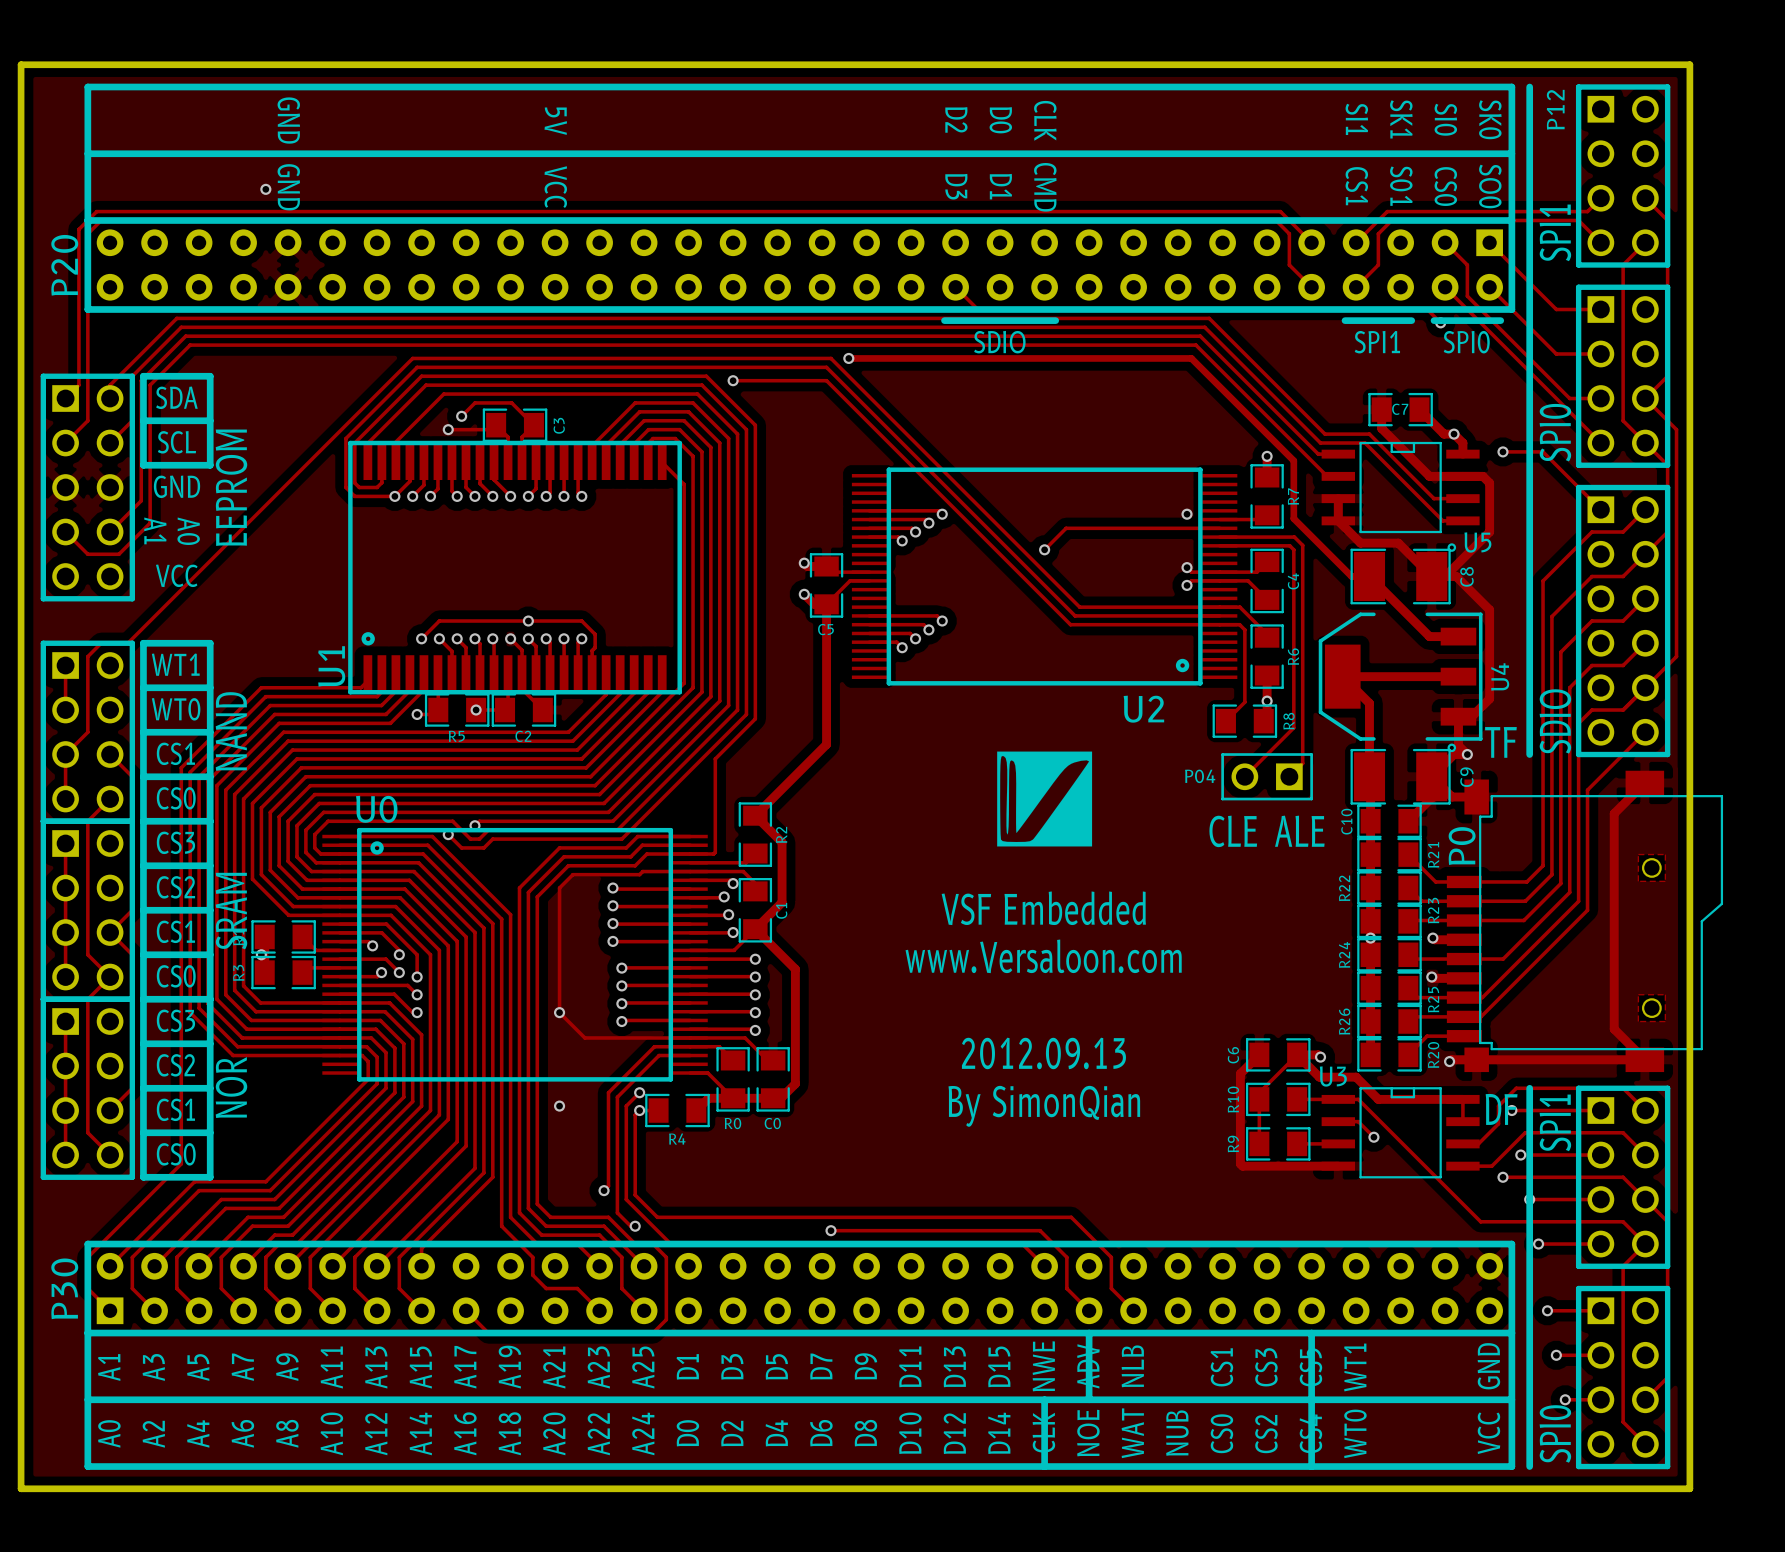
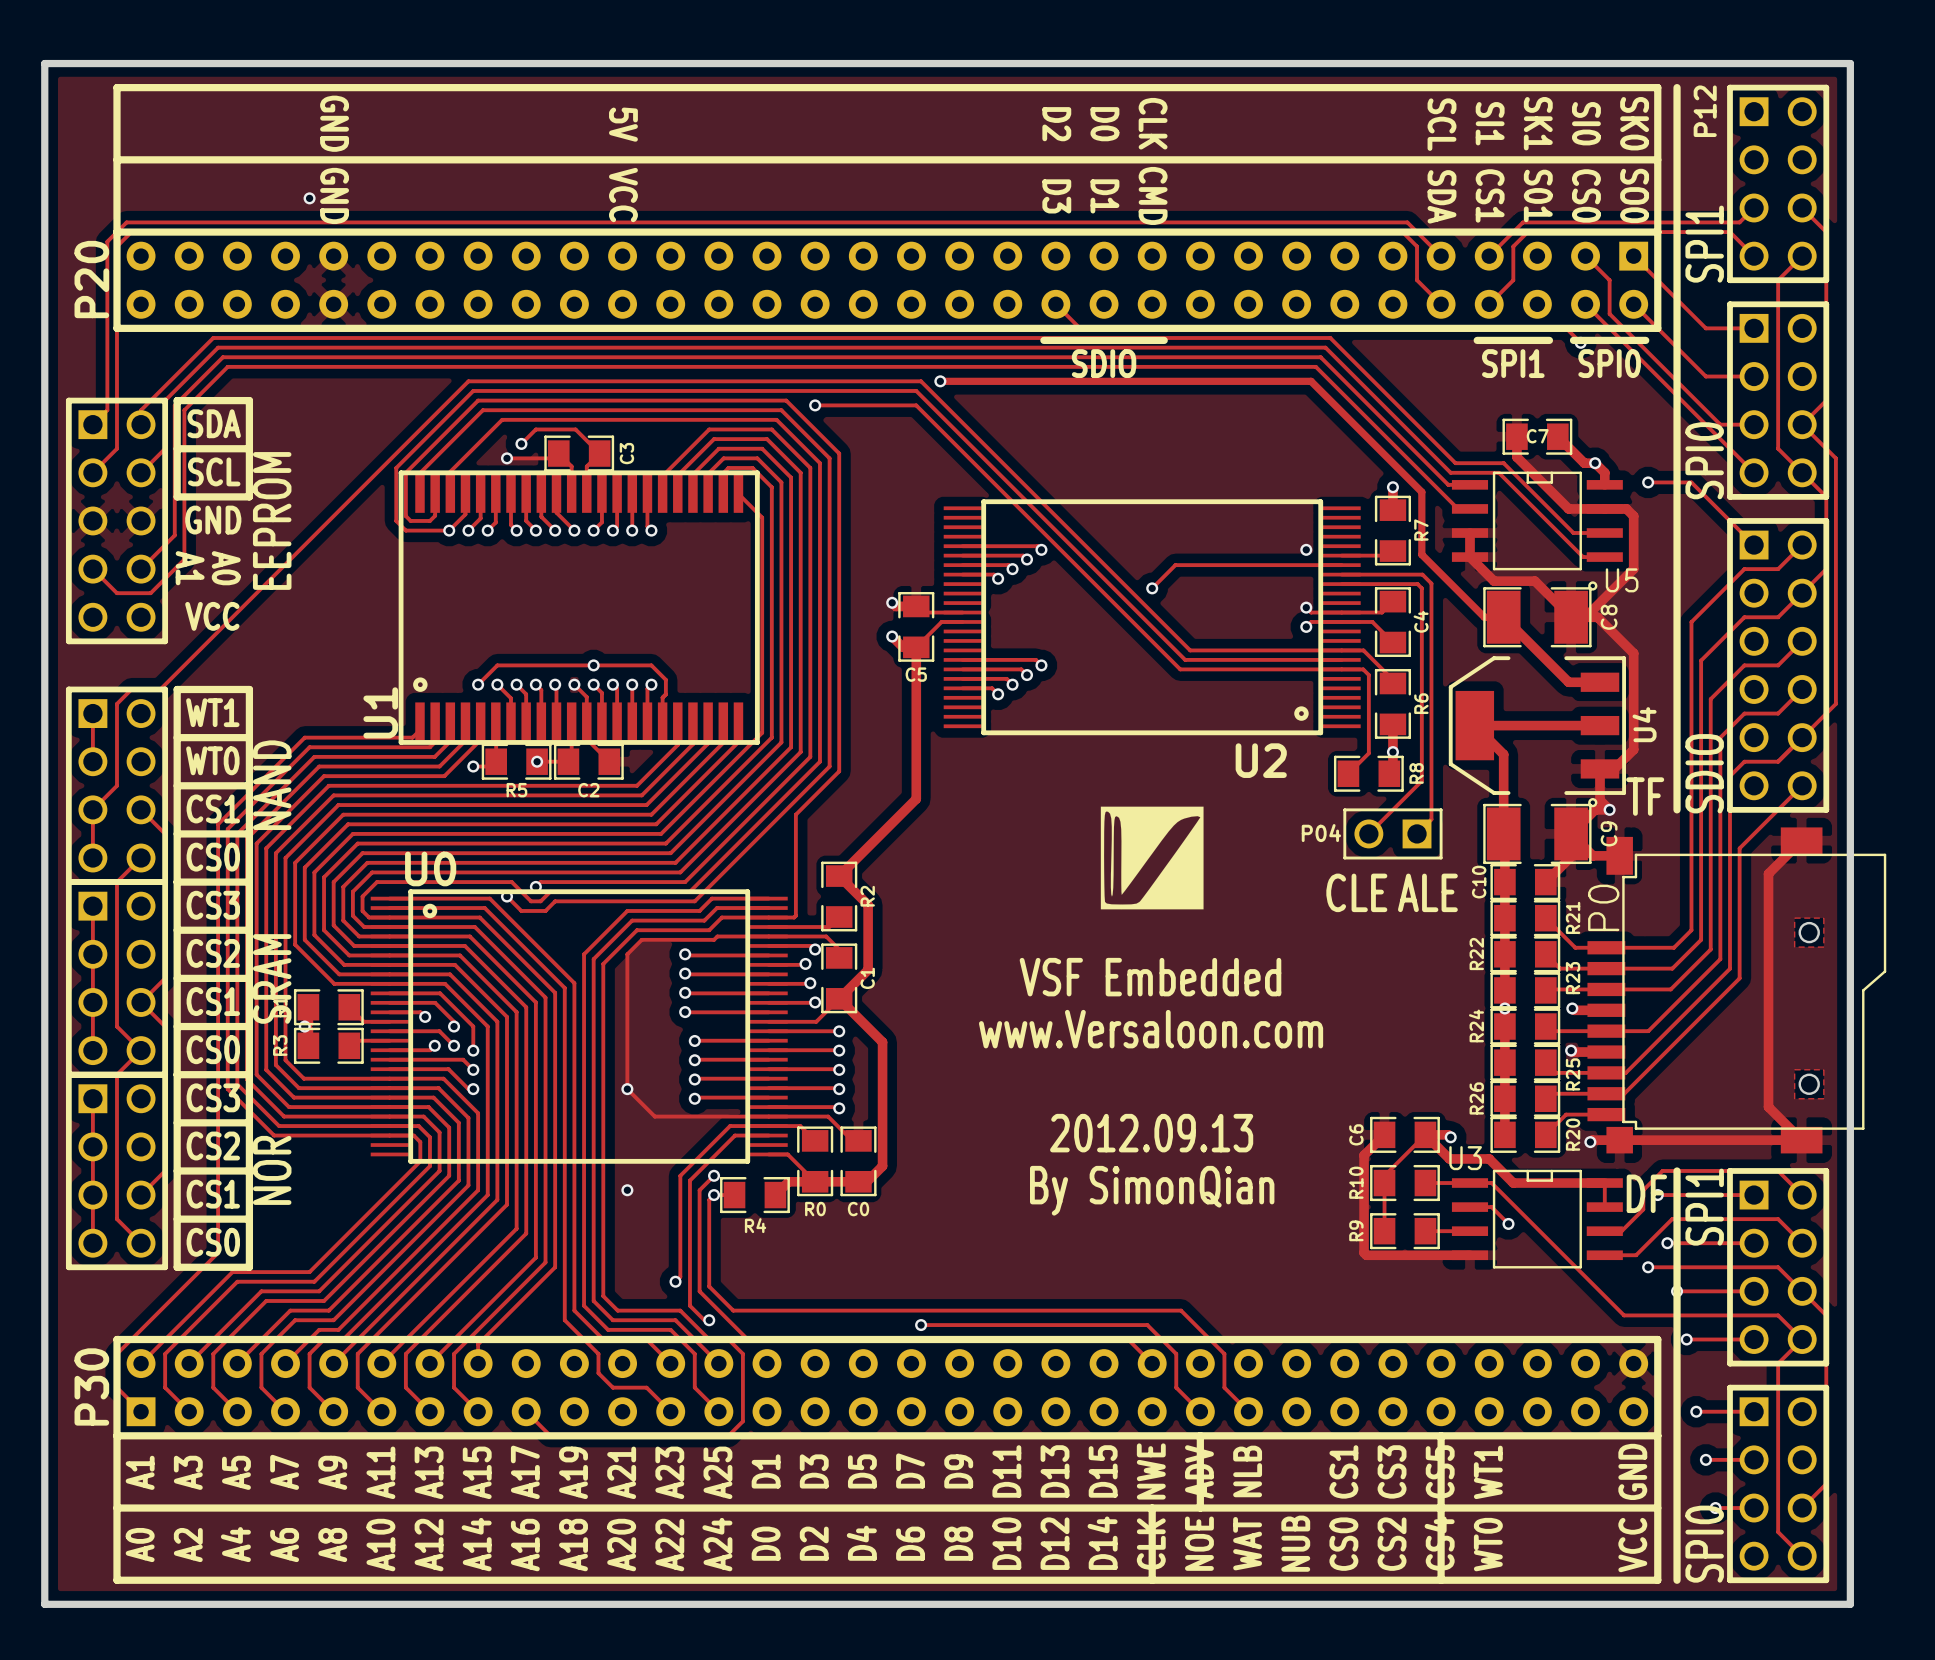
text: none -> SCL (1442, 124)
text: none -> SDA (1442, 196)

